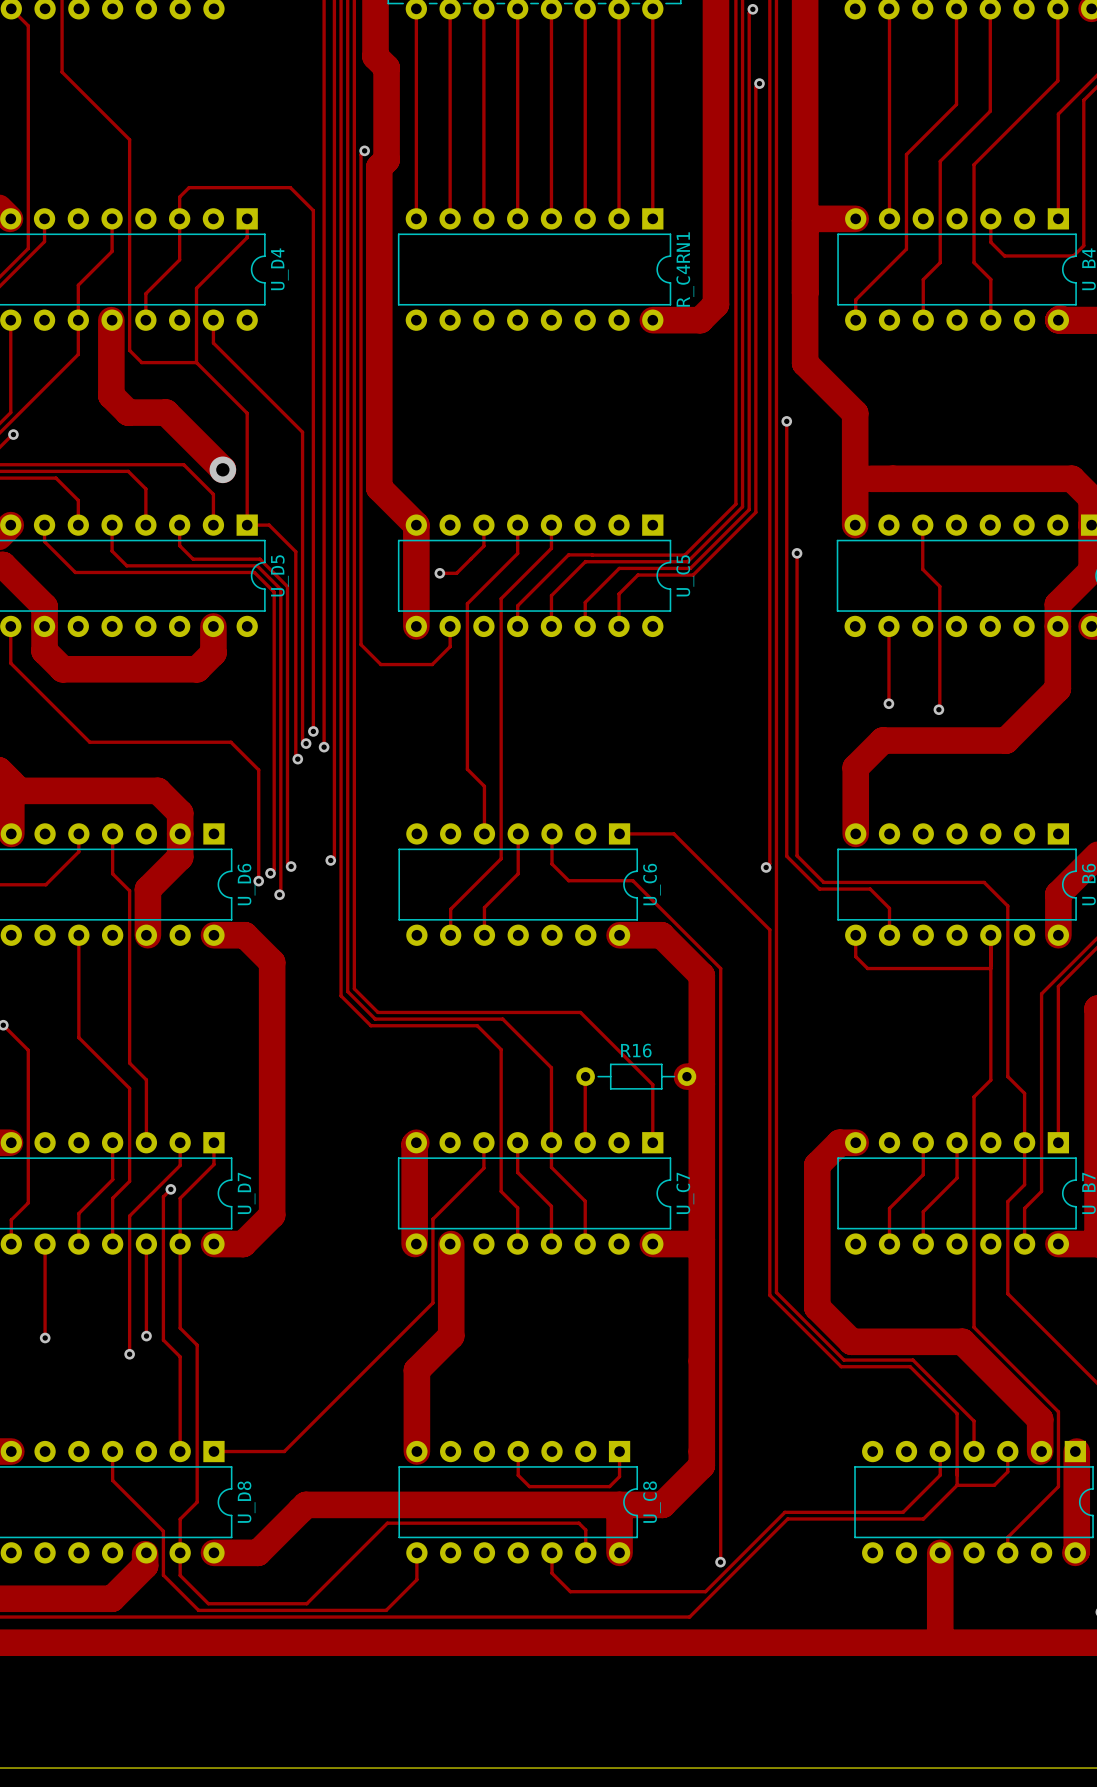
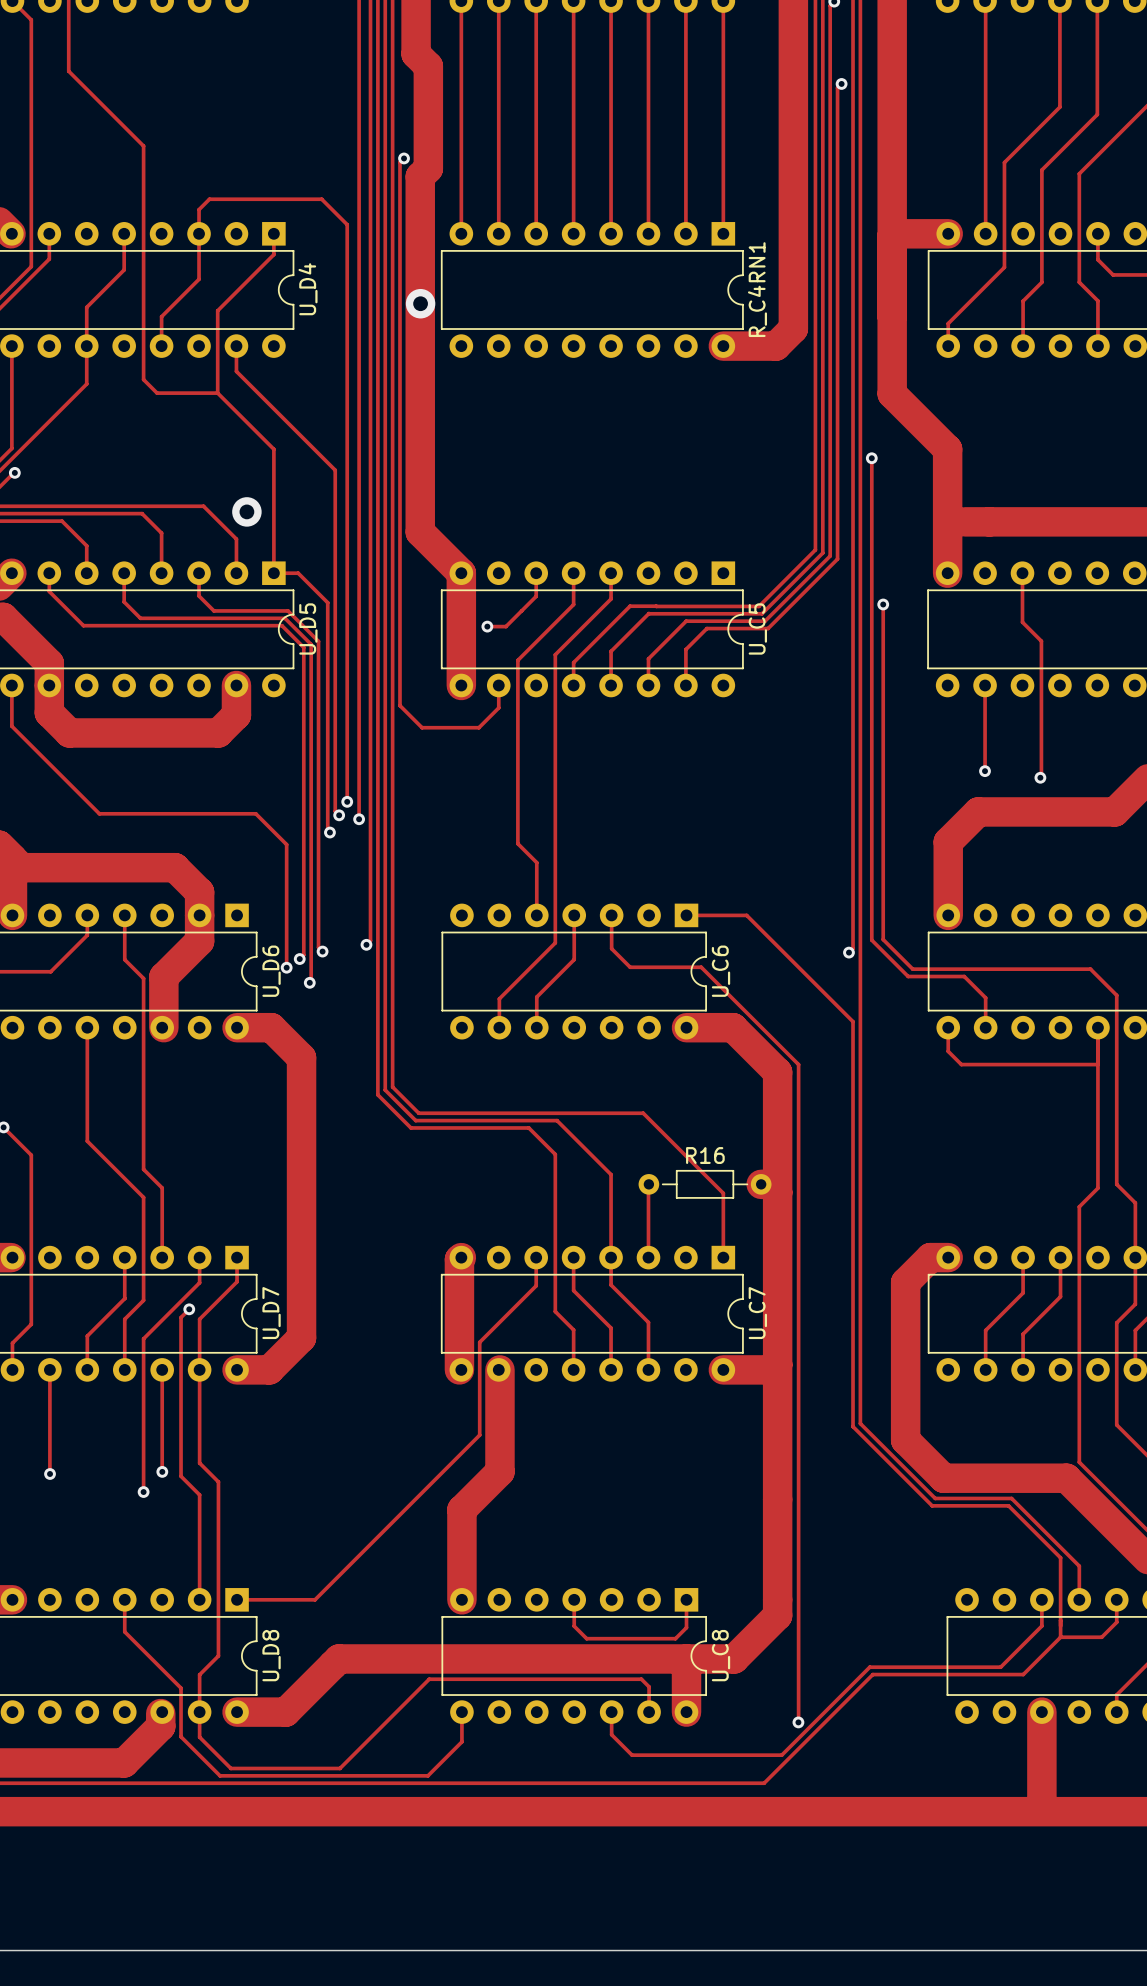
via: none -> (420, 303)
track: (111, 320) (111, 395) (128, 412) (166, 412) (222, 469) -> none

